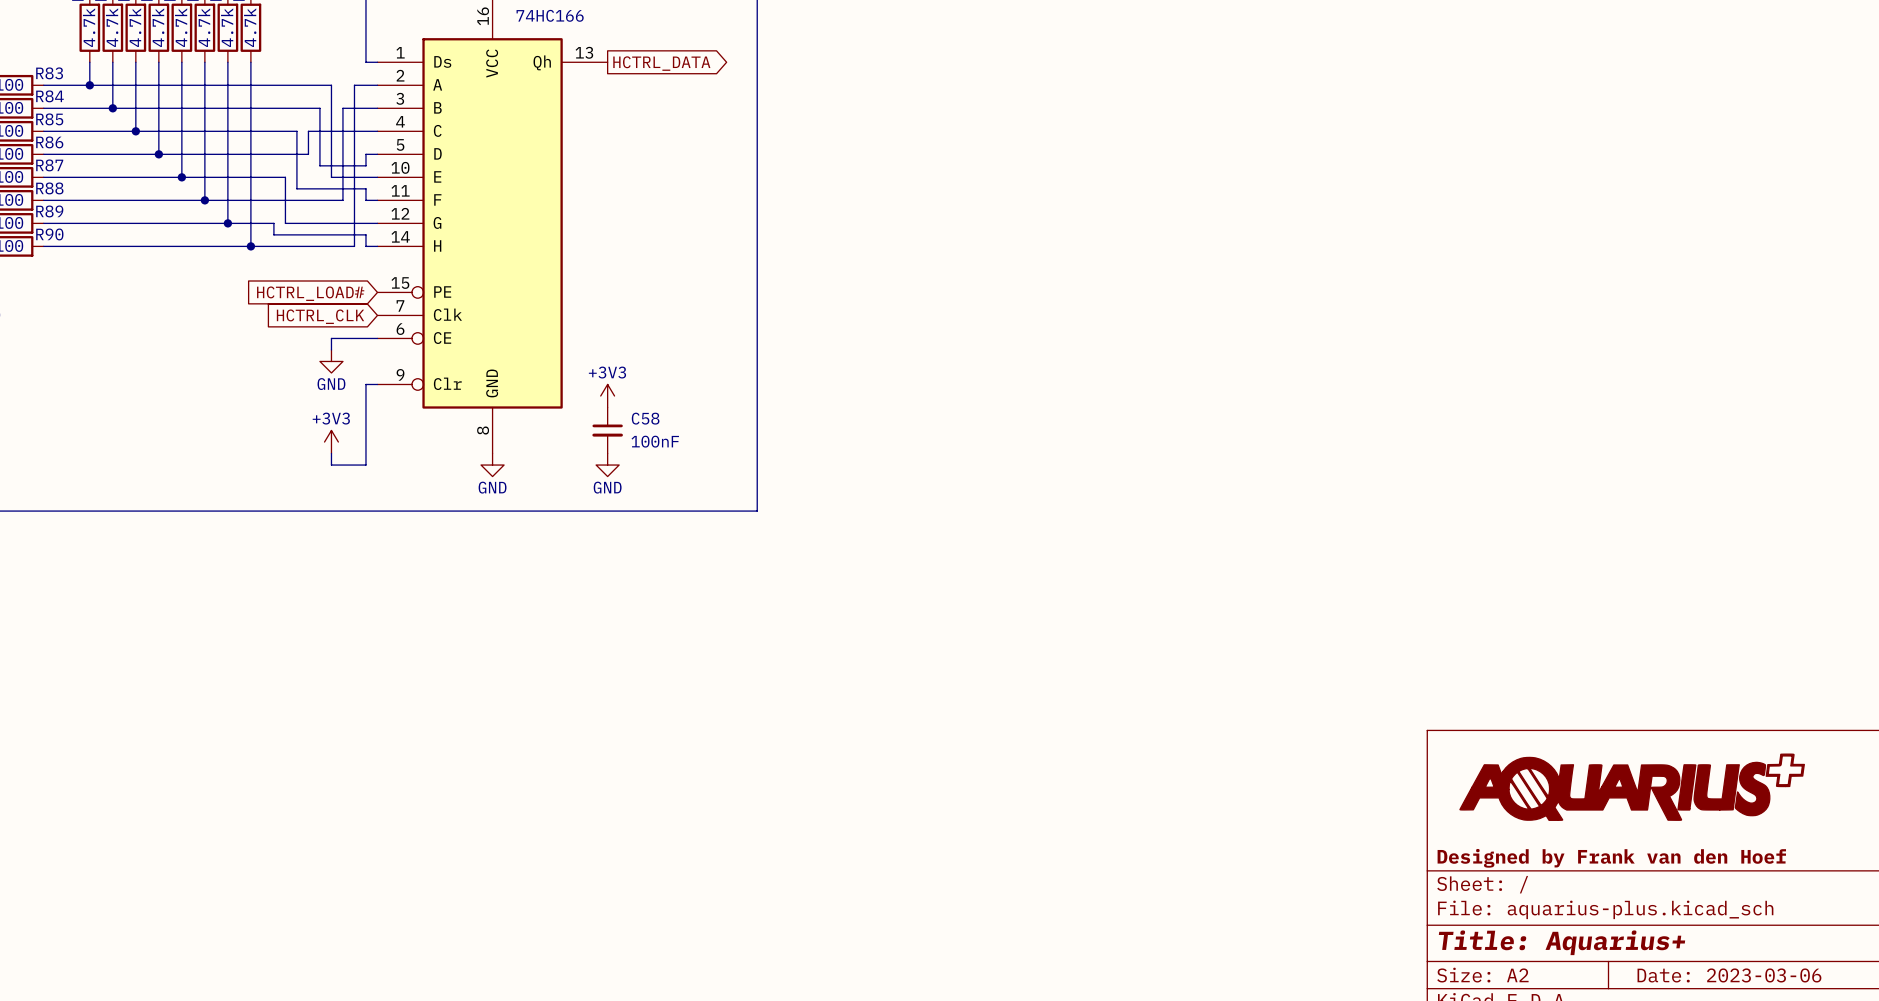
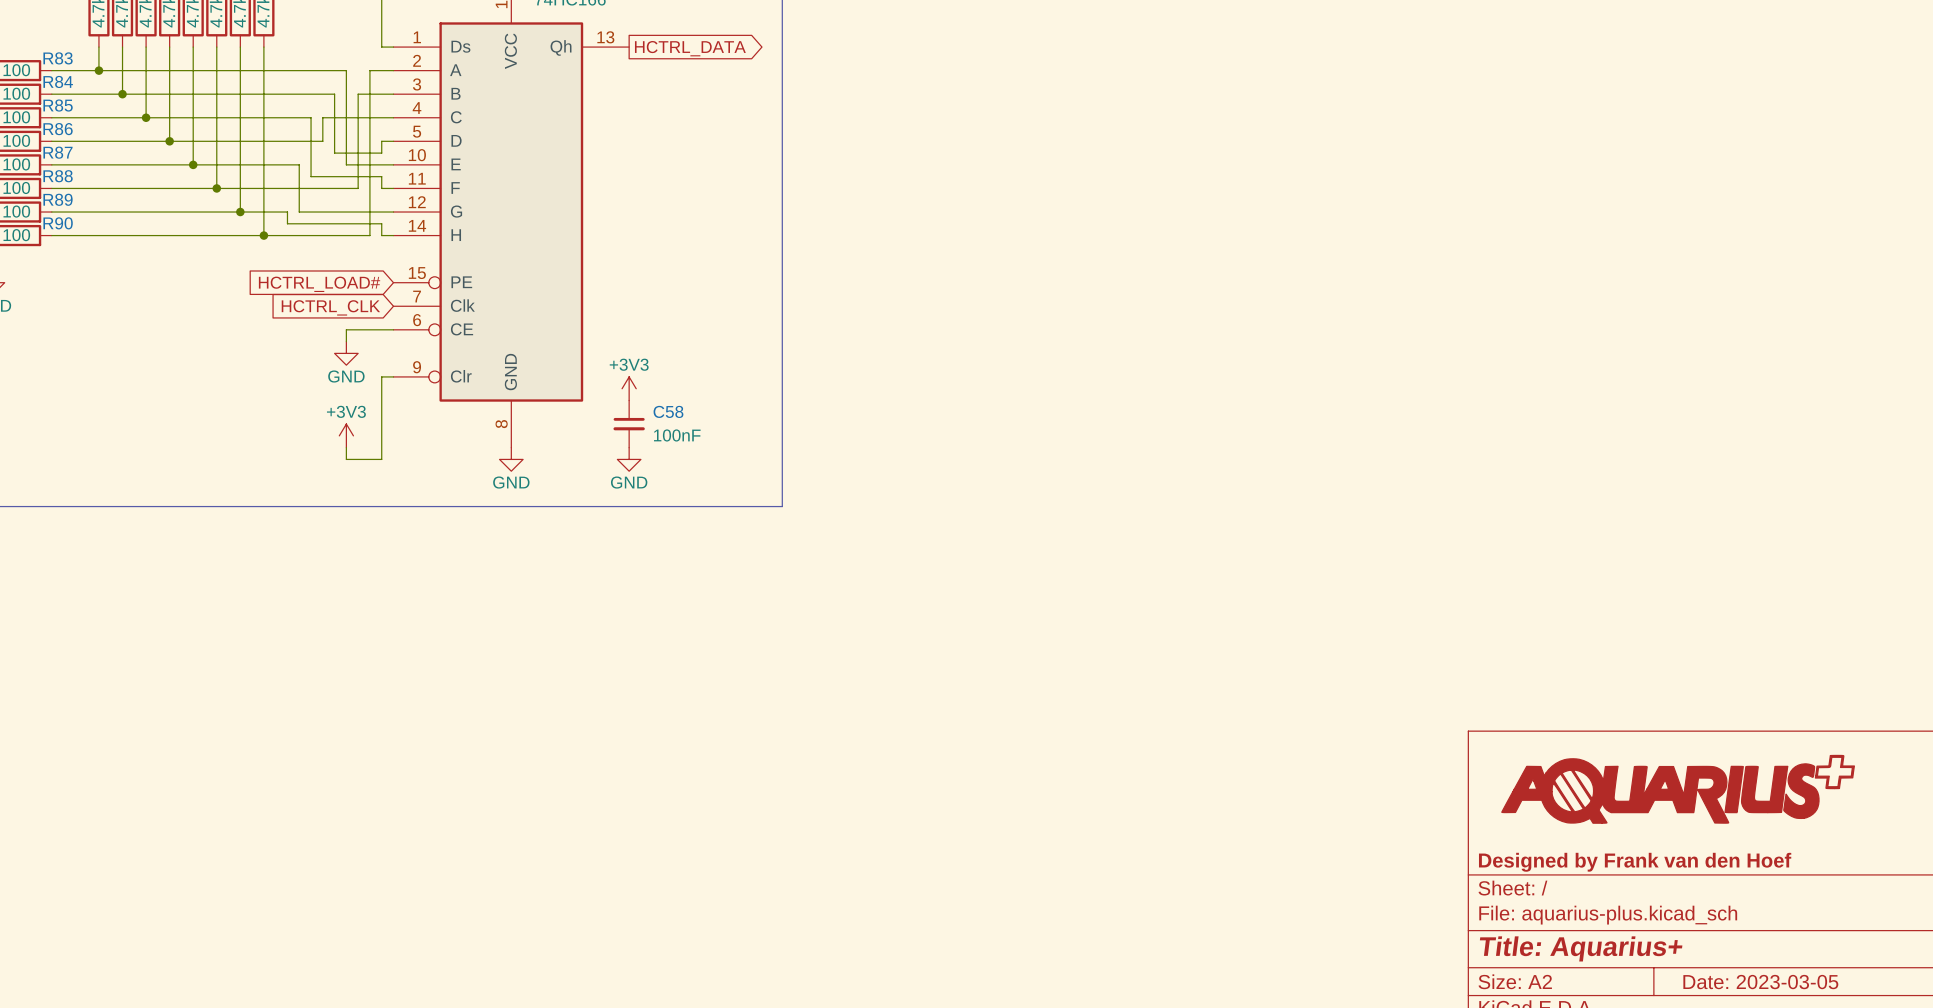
title block: Date: 2023-03-06 (1729, 975) -> Date: 2023-03-05 (1760, 982)

